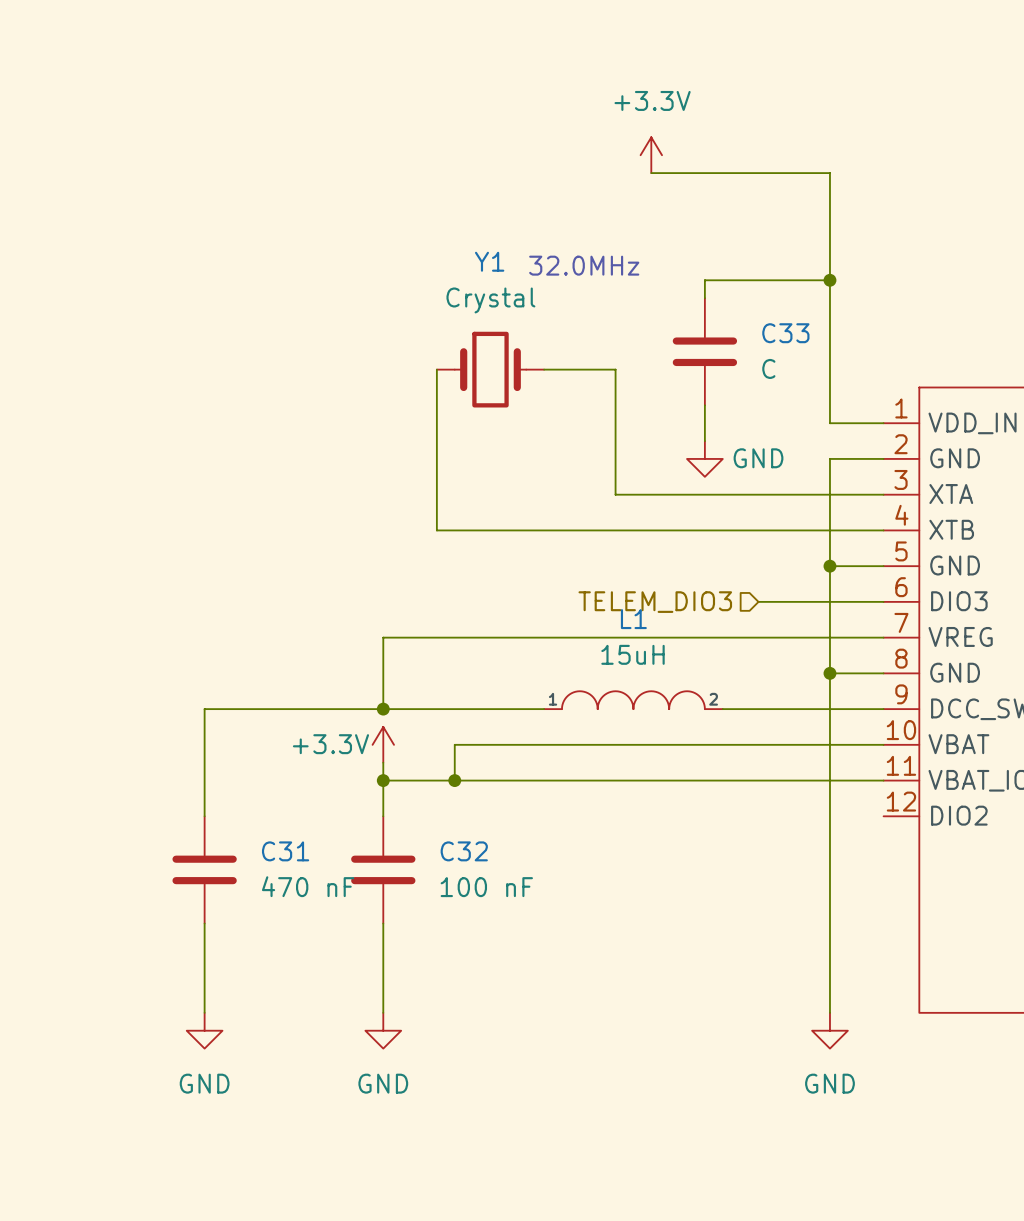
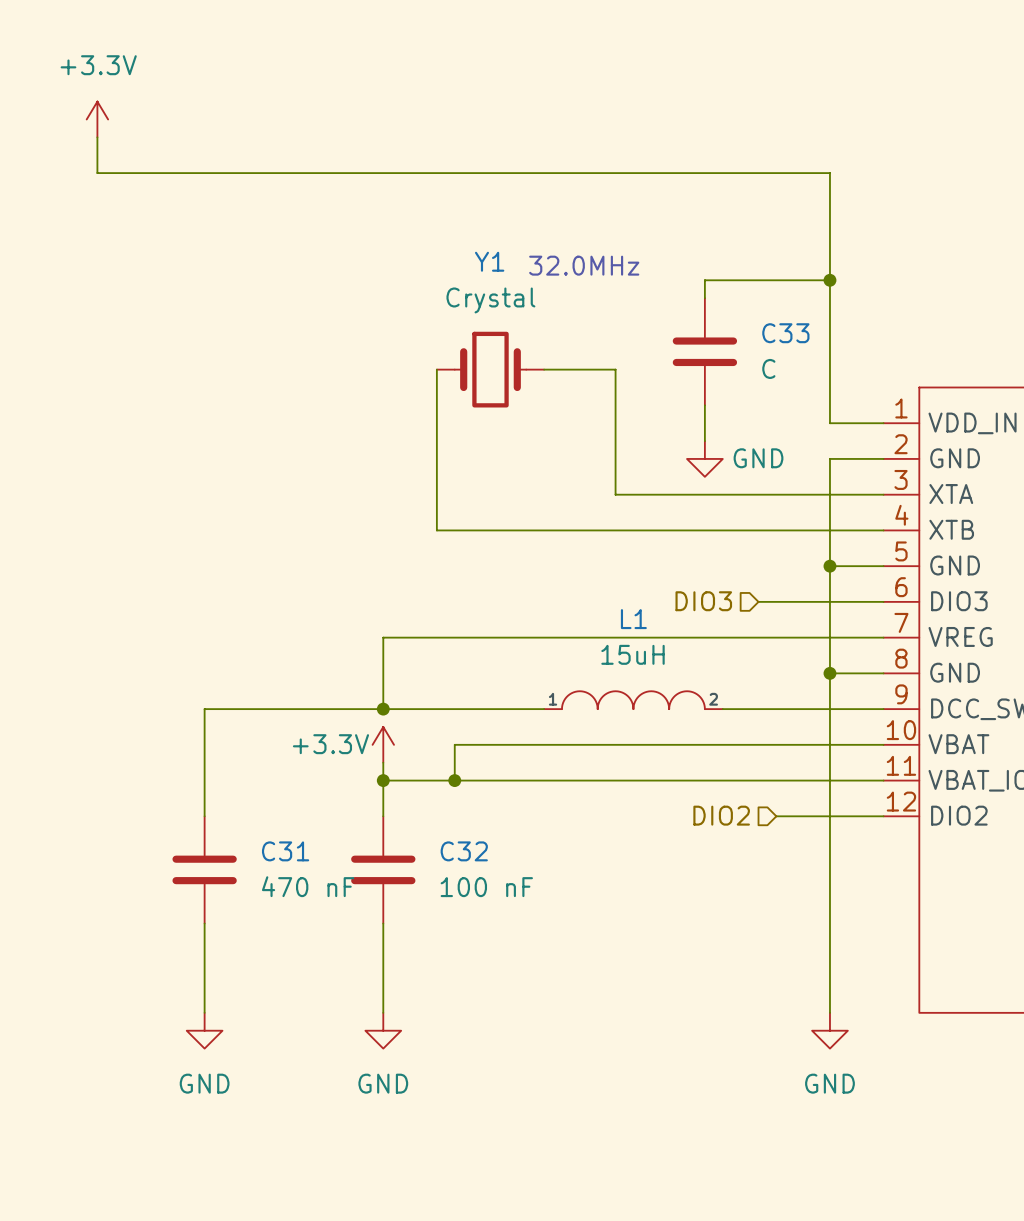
power symbol: none -> +3.3V (97, 119)
wire: none -> (97, 137) (97, 173) (651, 173)
power symbol: +3.3V (651, 155) -> none
hierarchical label: TELEM_DIO3 (655, 602) -> DIO3 (703, 601)
hierarchical label: none -> DIO2 (721, 815)
wire: none -> (776, 816) (883, 816)

